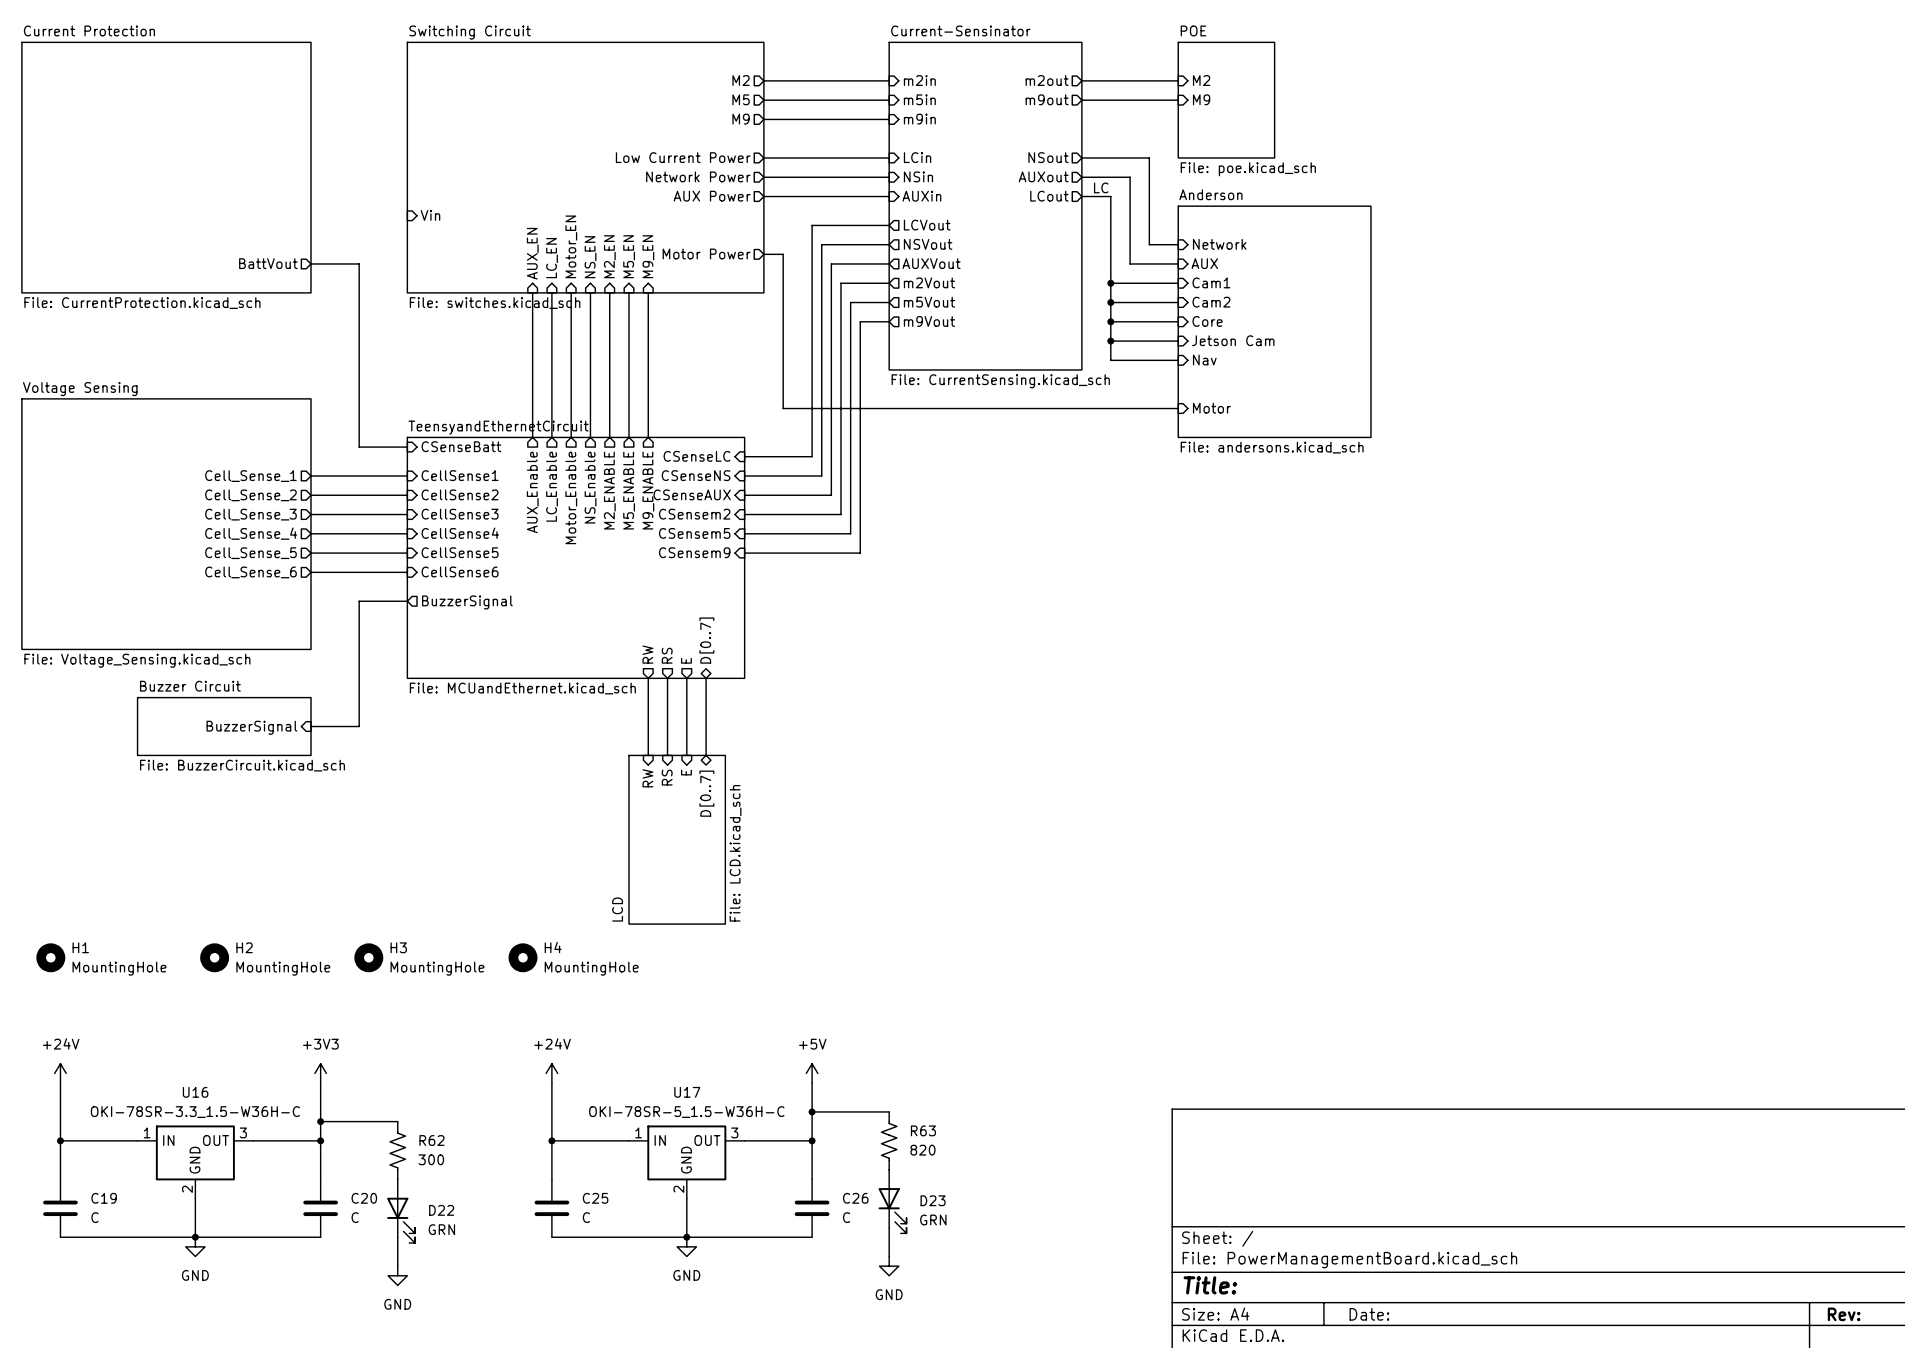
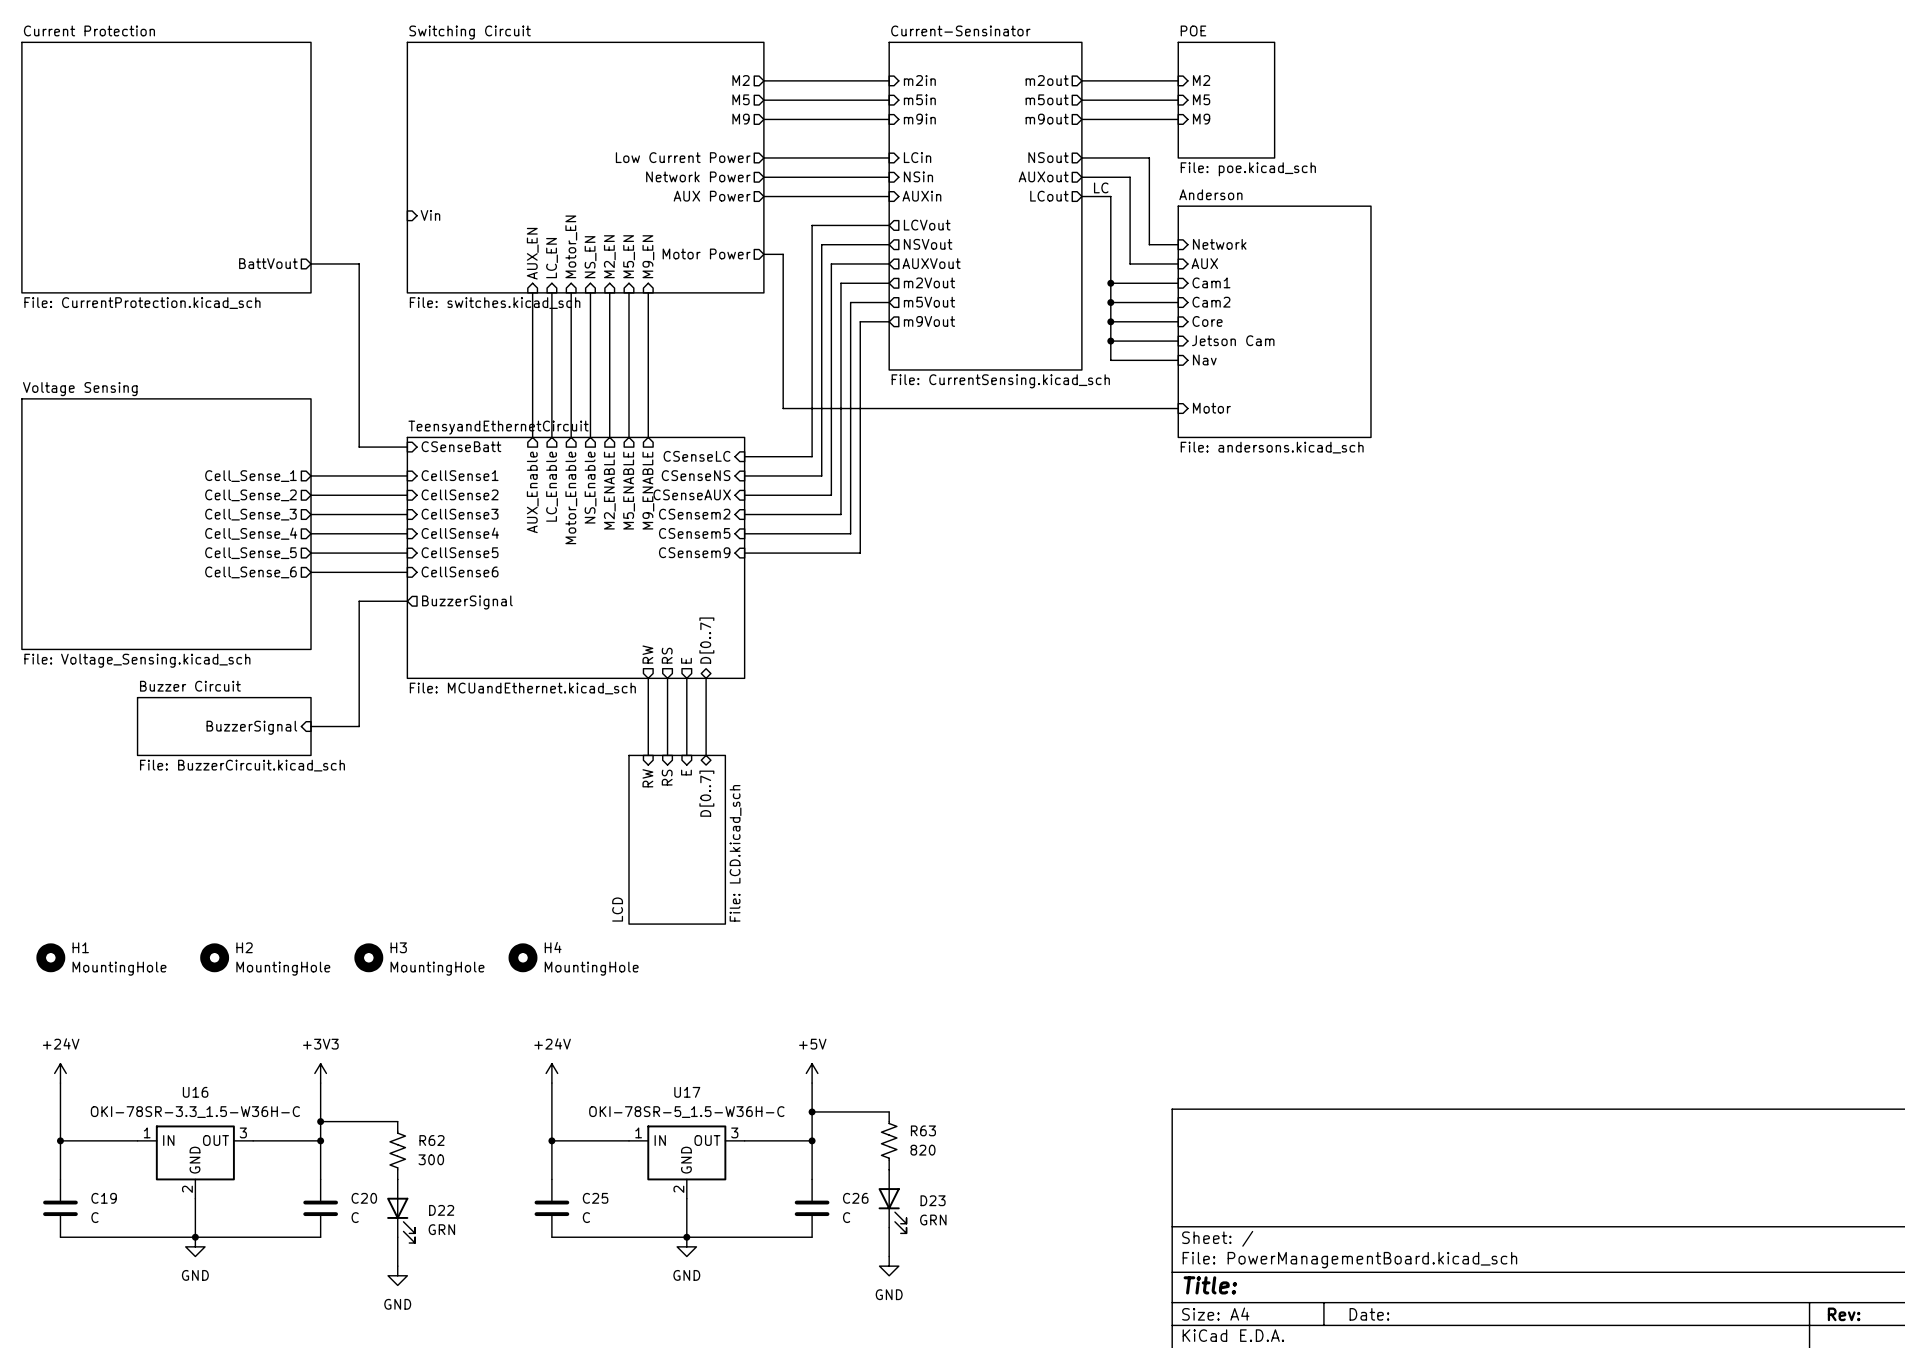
sheet pin: m9out (1047, 99) -> m5out (1047, 99)
sheet pin: M9 (1201, 99) -> M5 (1201, 99)
sheet pin: none -> m9out (1047, 119)
wire: none -> (1081, 119) (1178, 119)
sheet pin: none -> M9 (1201, 119)

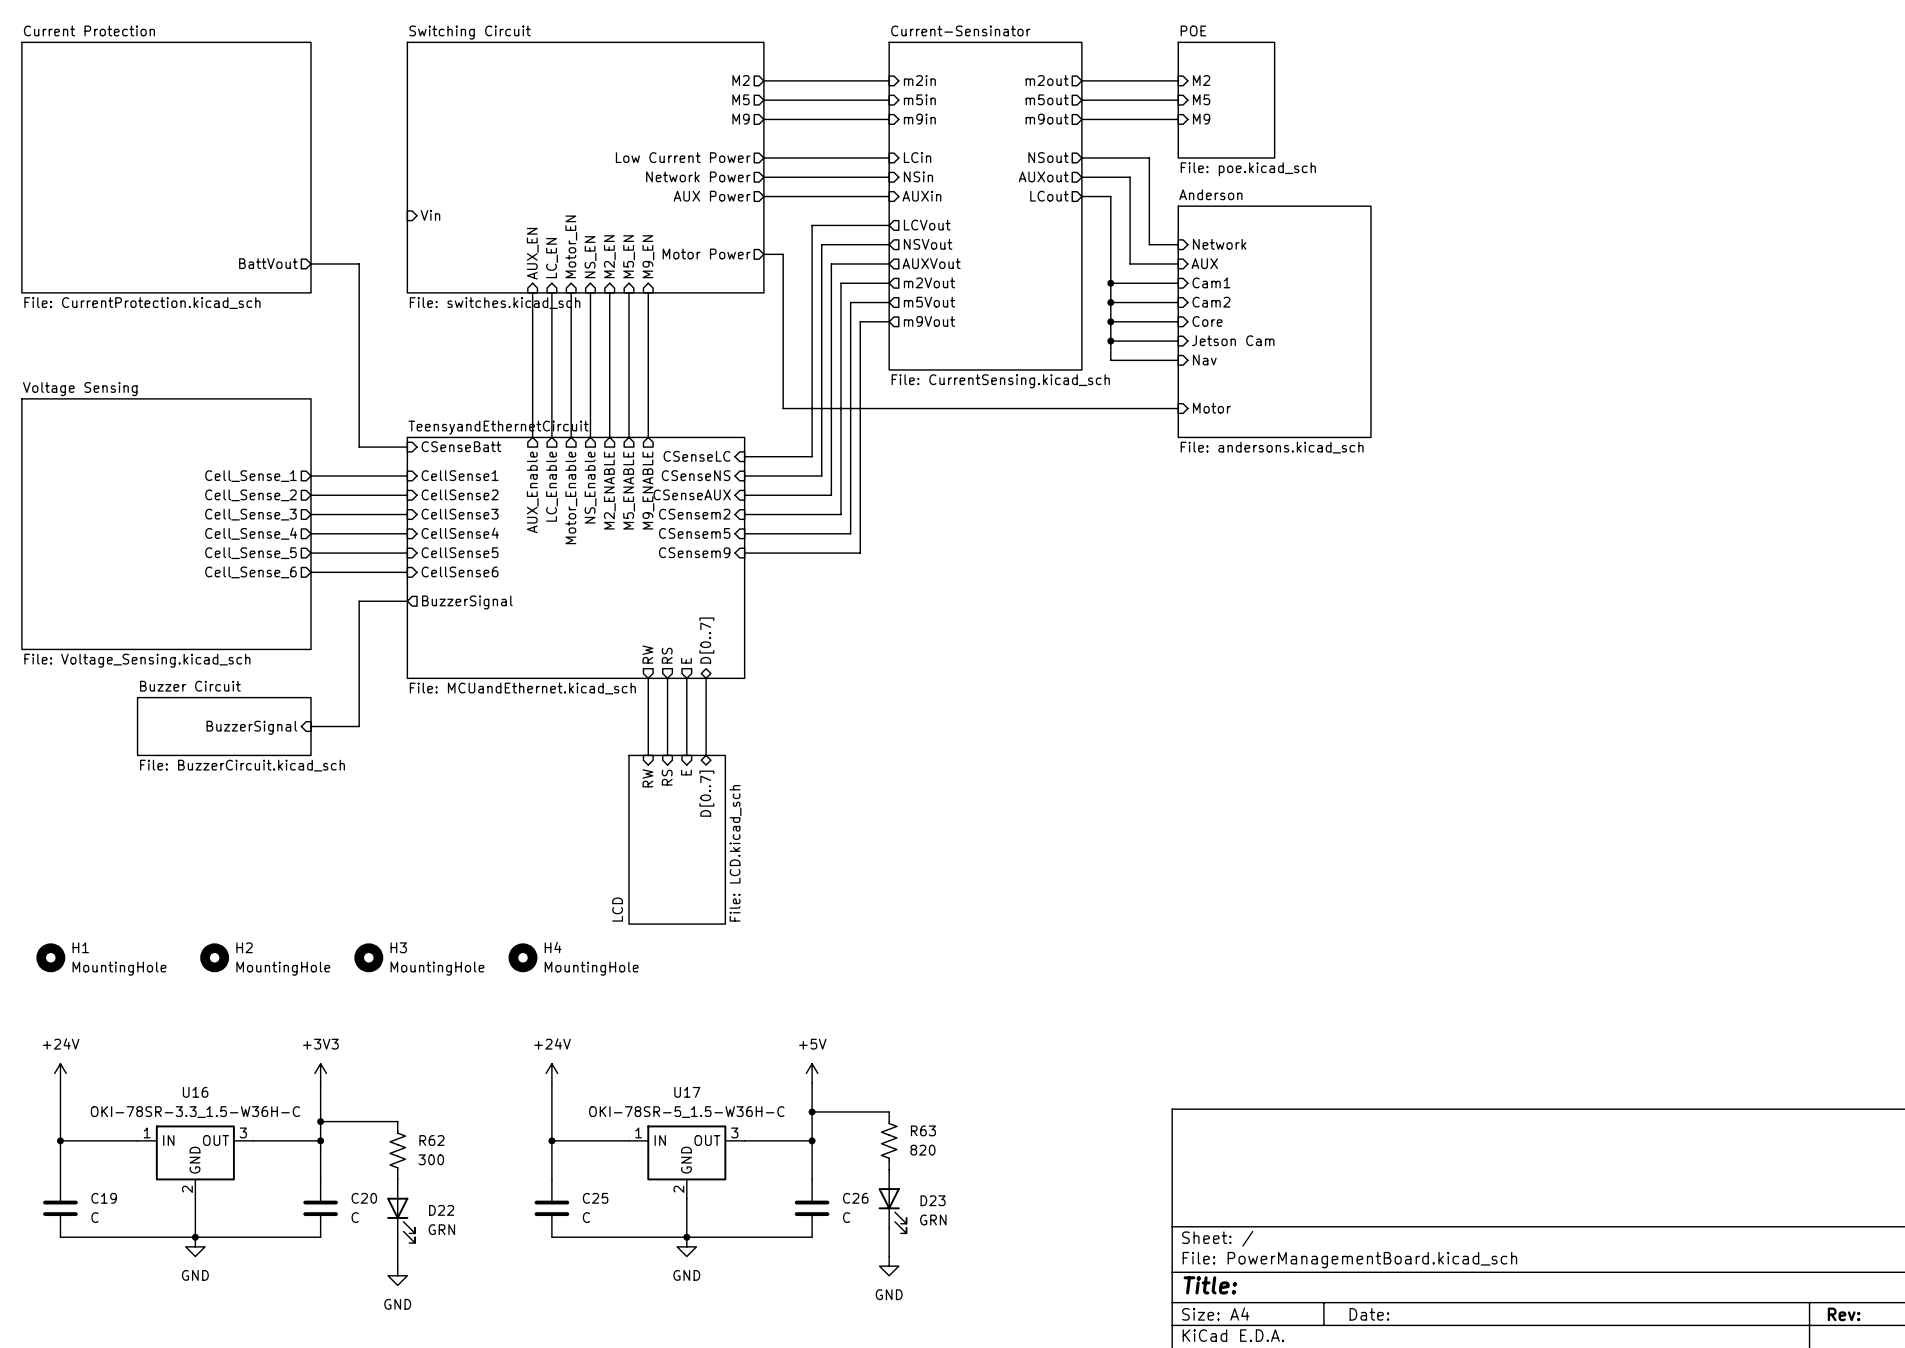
label: LC (1101, 187) -> none

